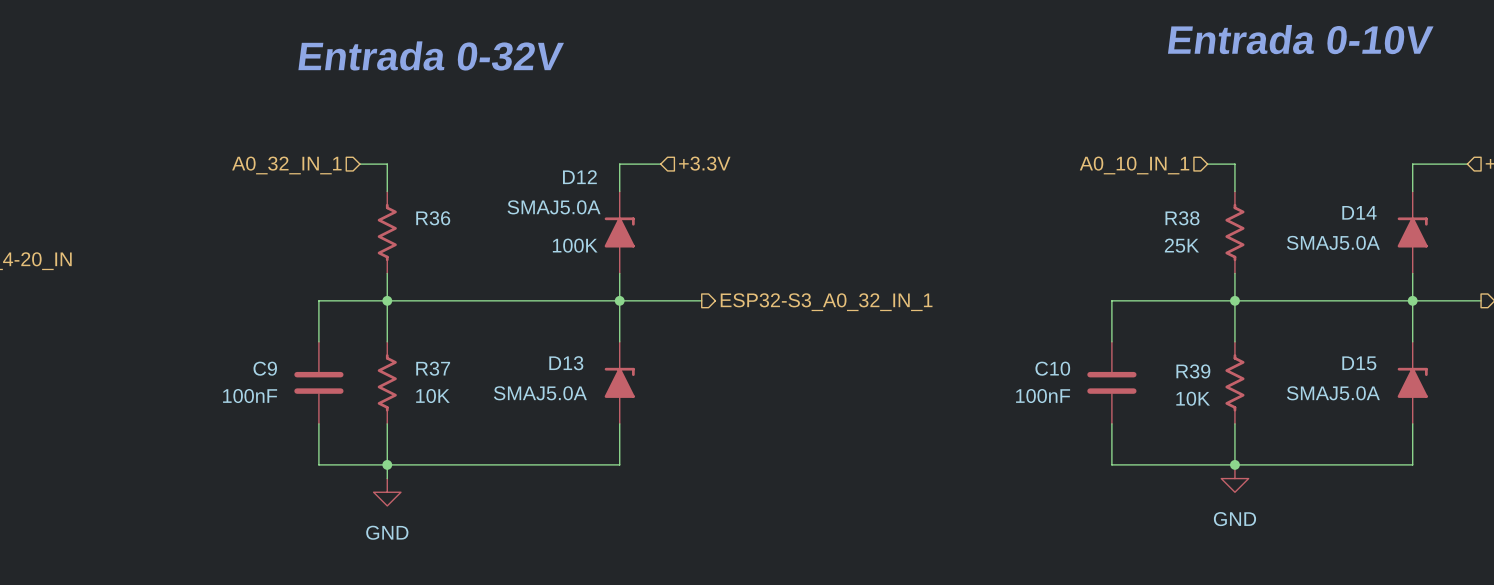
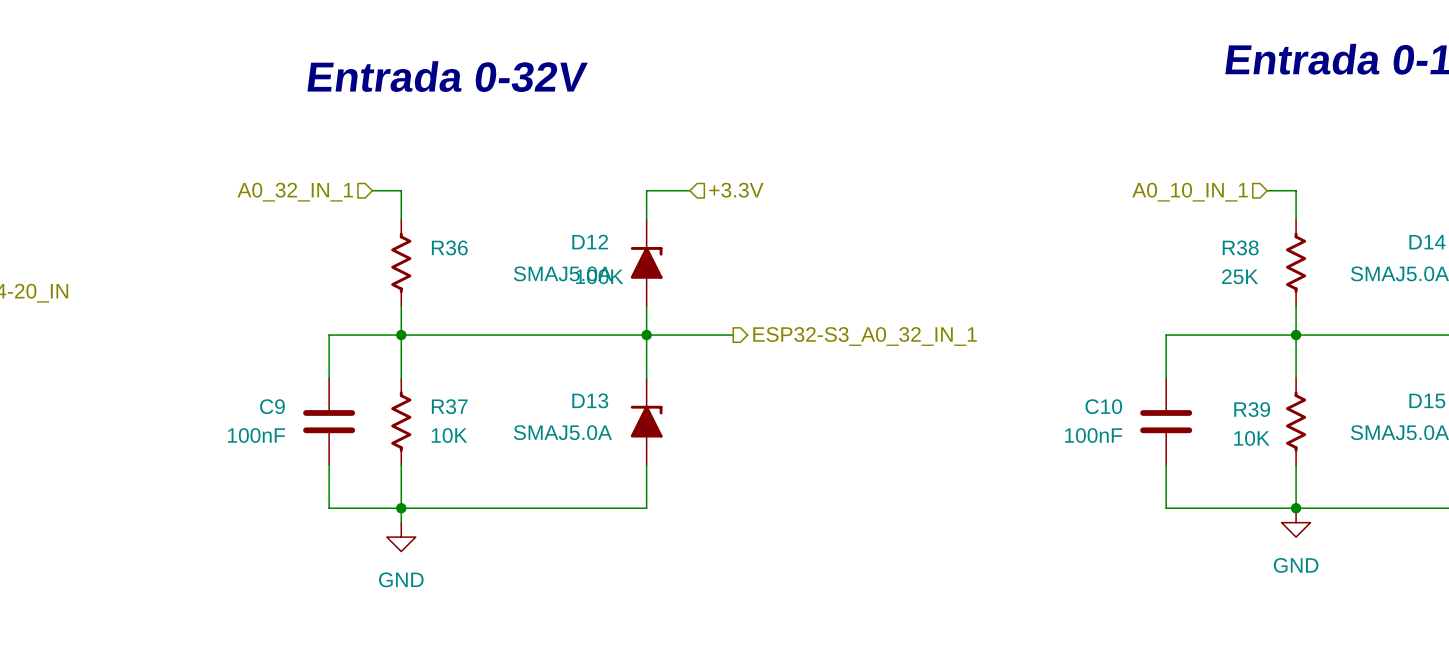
D12 name position: D12 (579, 177) -> D12 (590, 242)
D12 value position: SMAJ5.0A (554, 207) -> SMAJ5.0A (562, 273)

